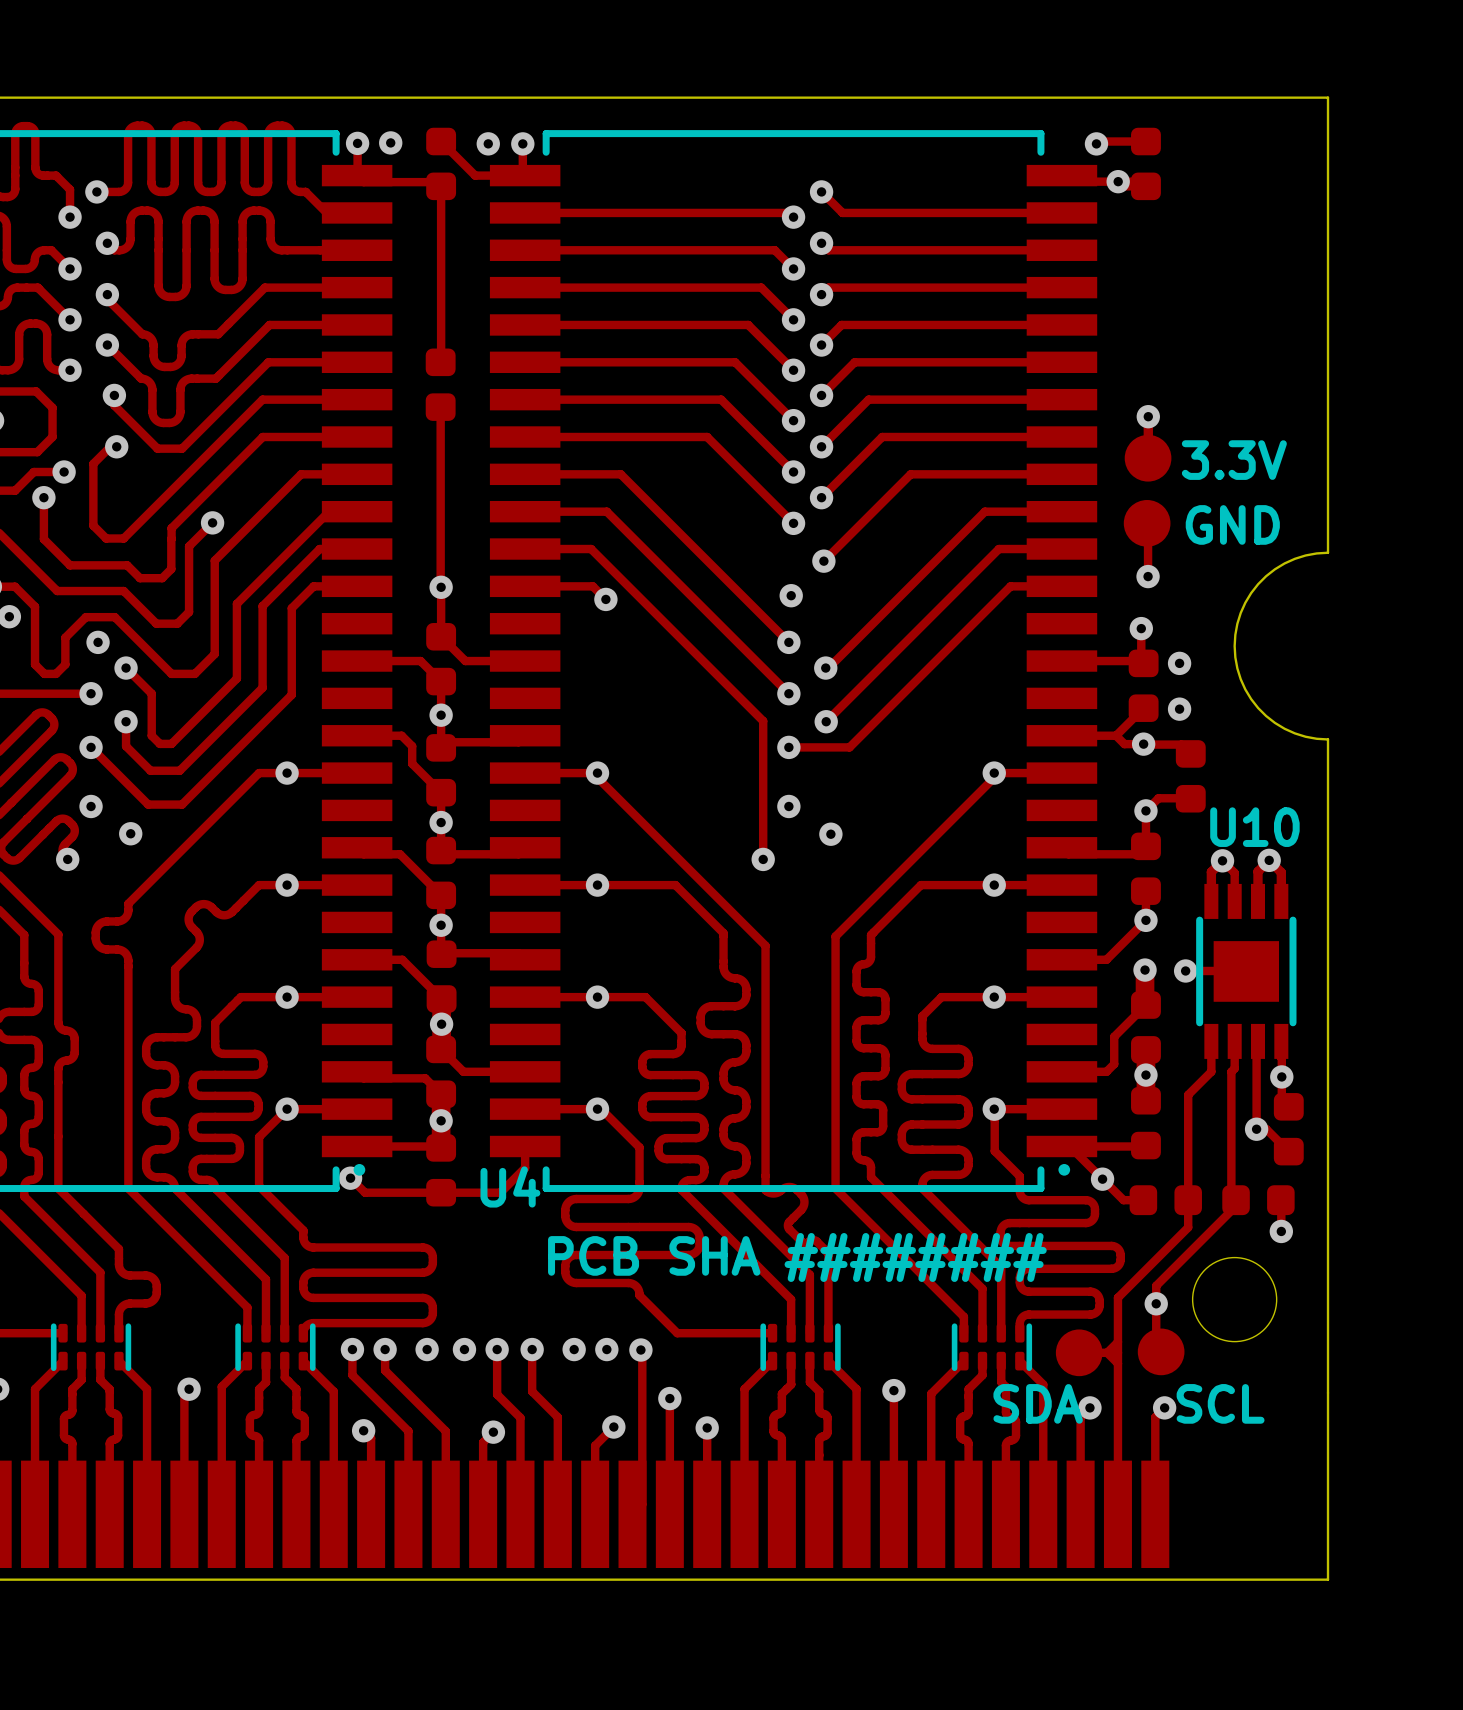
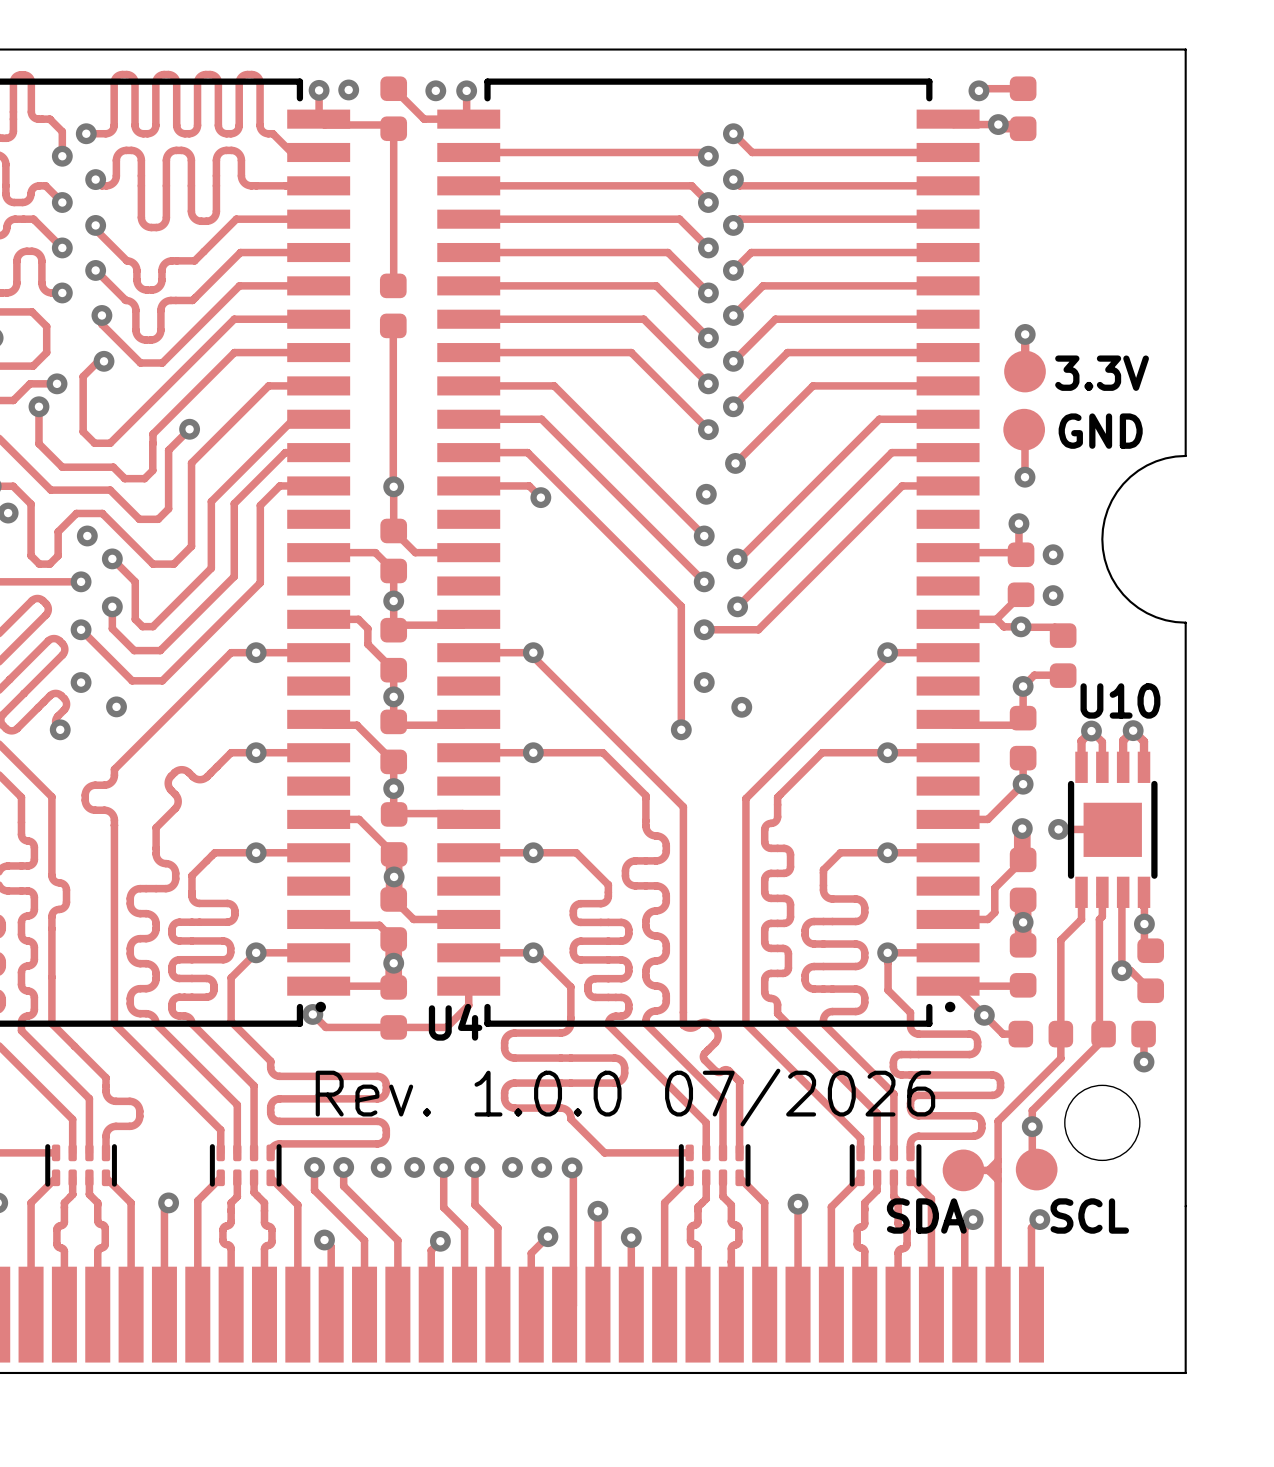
text: PCB SHA ######## (797, 1257) -> none
text: none -> Rev. 1.0.0 07/2026 (625, 1097)

